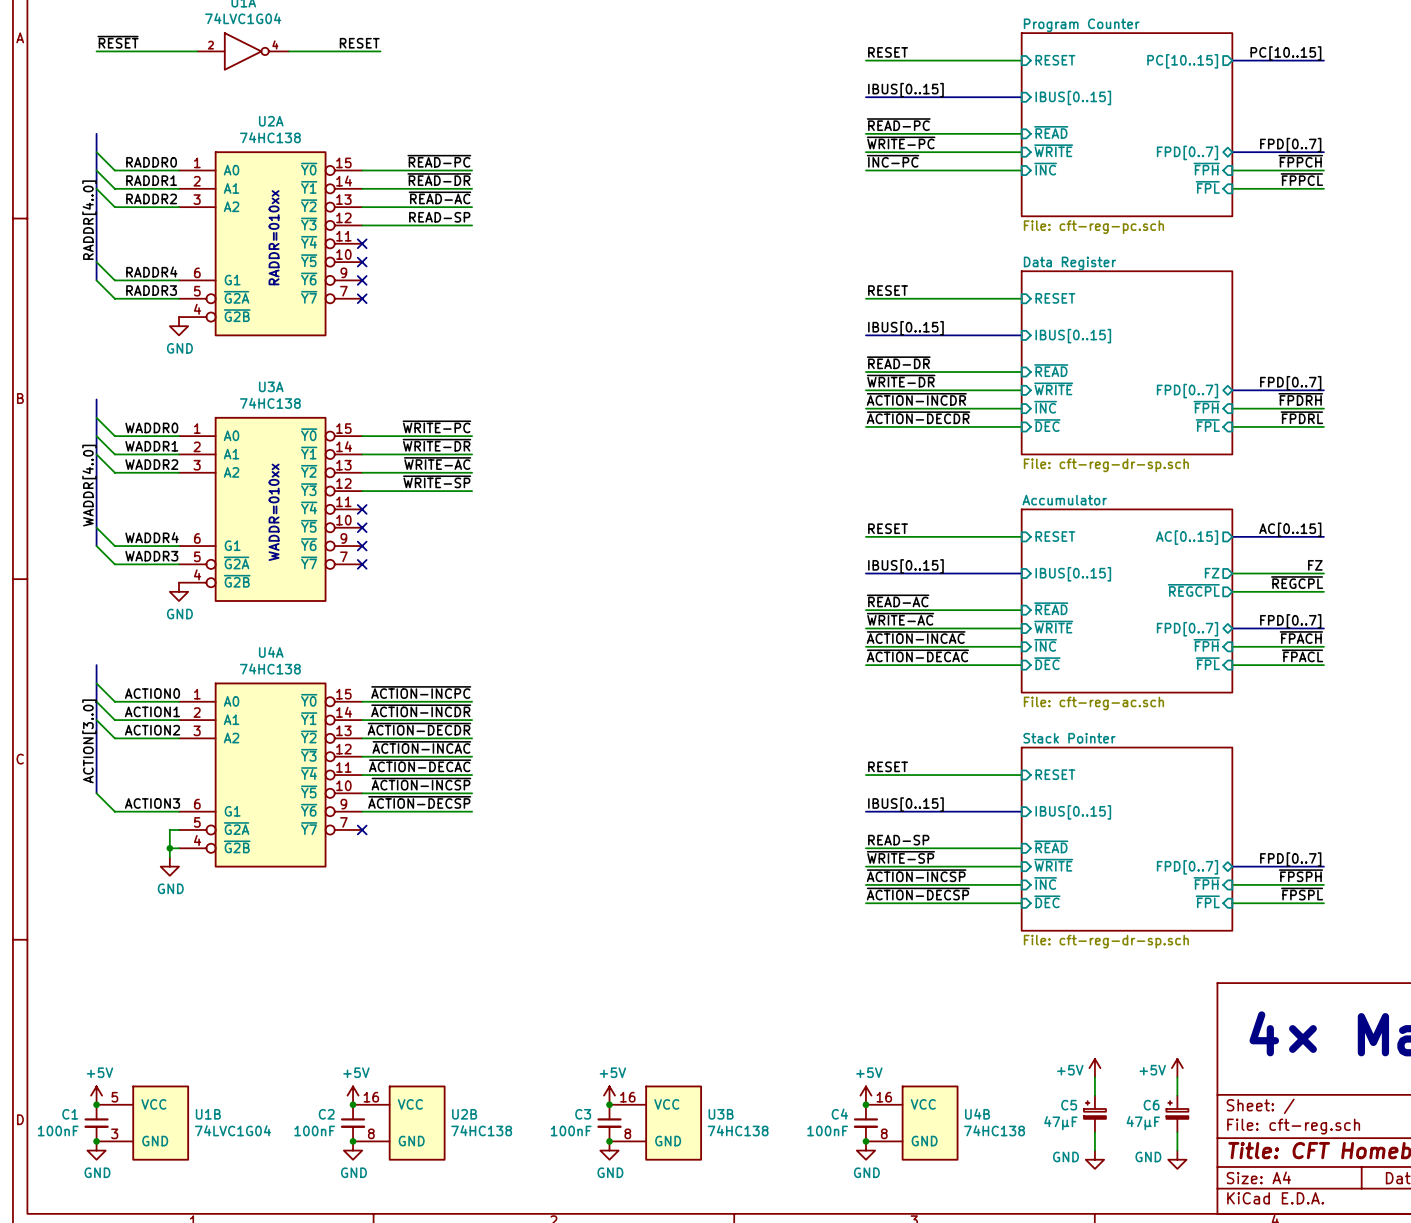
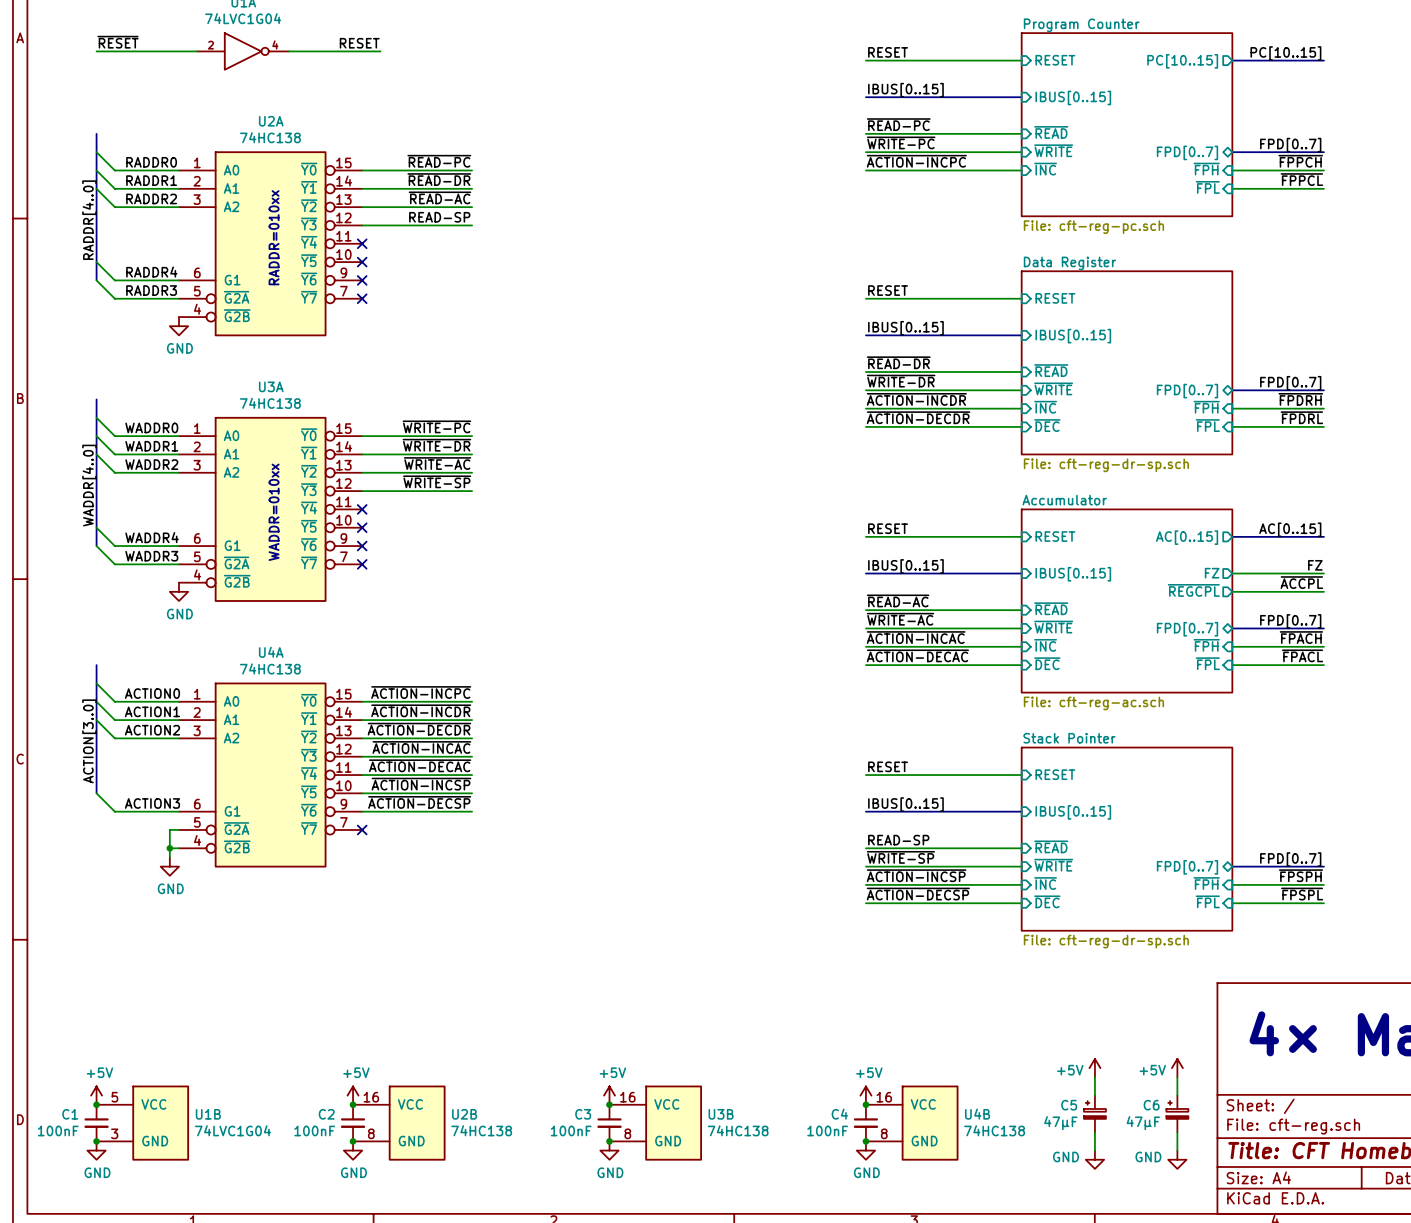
label: ~{INC-PC} (893, 161) -> ~{ACTION-INCPC} (916, 161)
label: ~{REGCPL} (1297, 582) -> ~{ACCPL} (1301, 582)

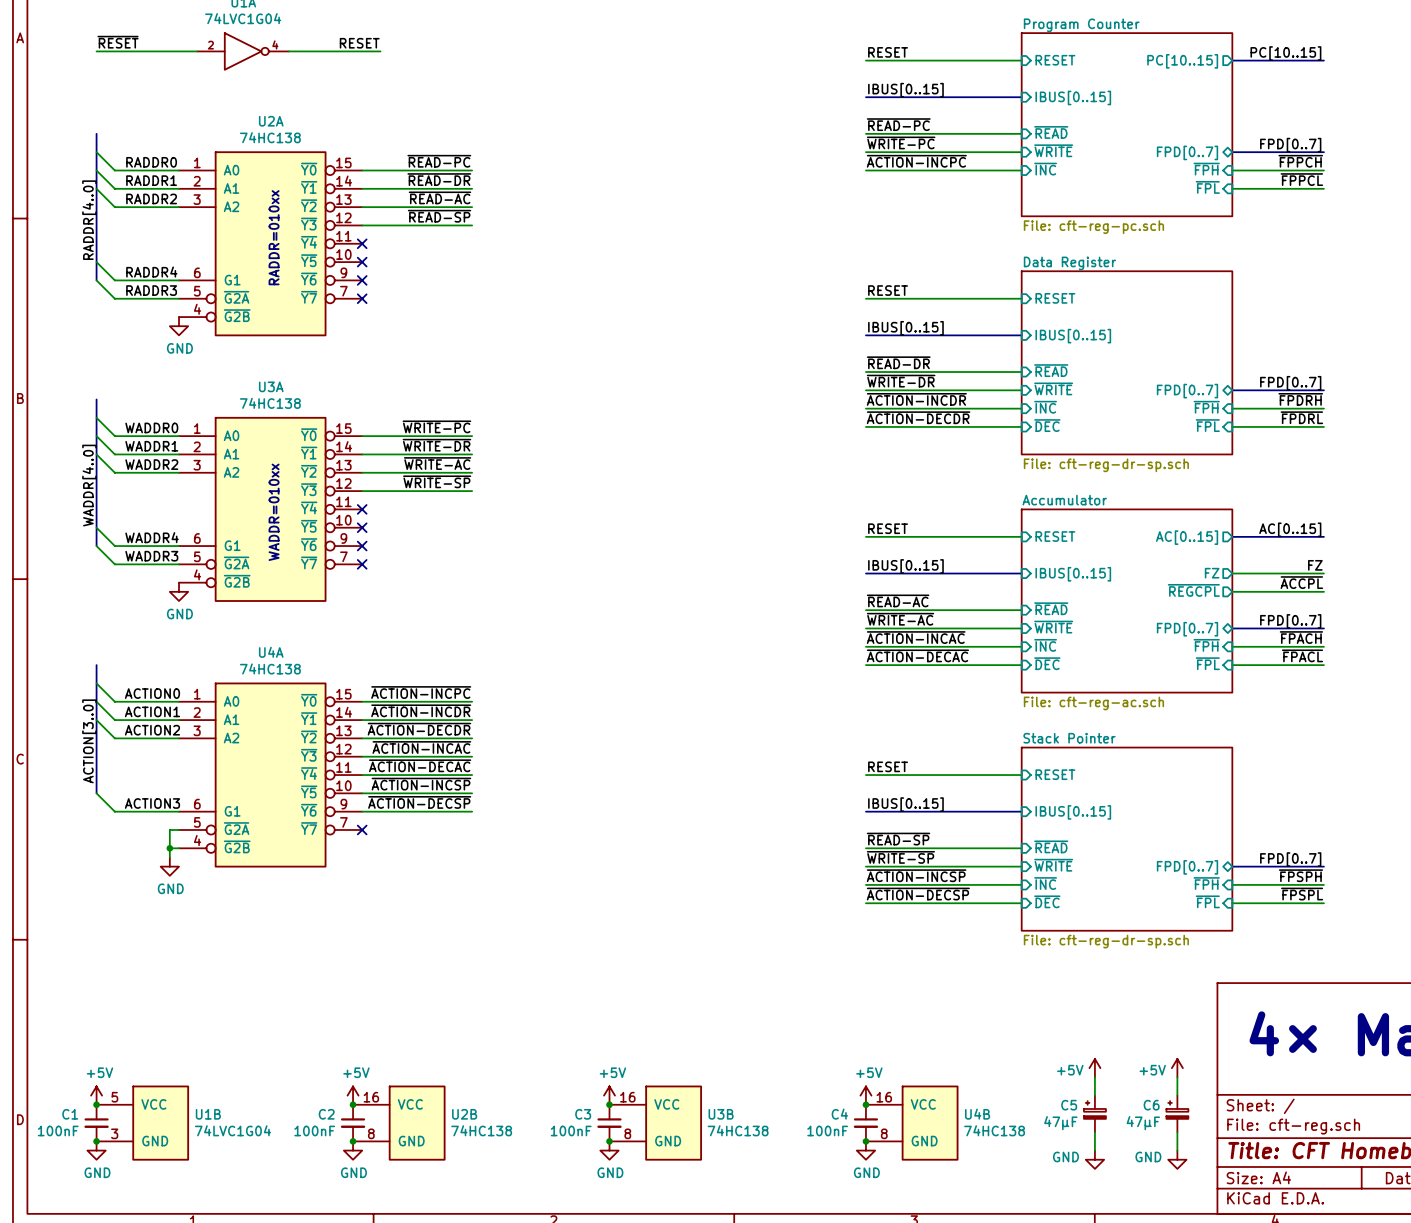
label: READ-SP (439, 217) -> ~{READ-SP} (439, 216)
label: READ-SP (898, 840) -> ~{READ-SP} (898, 839)

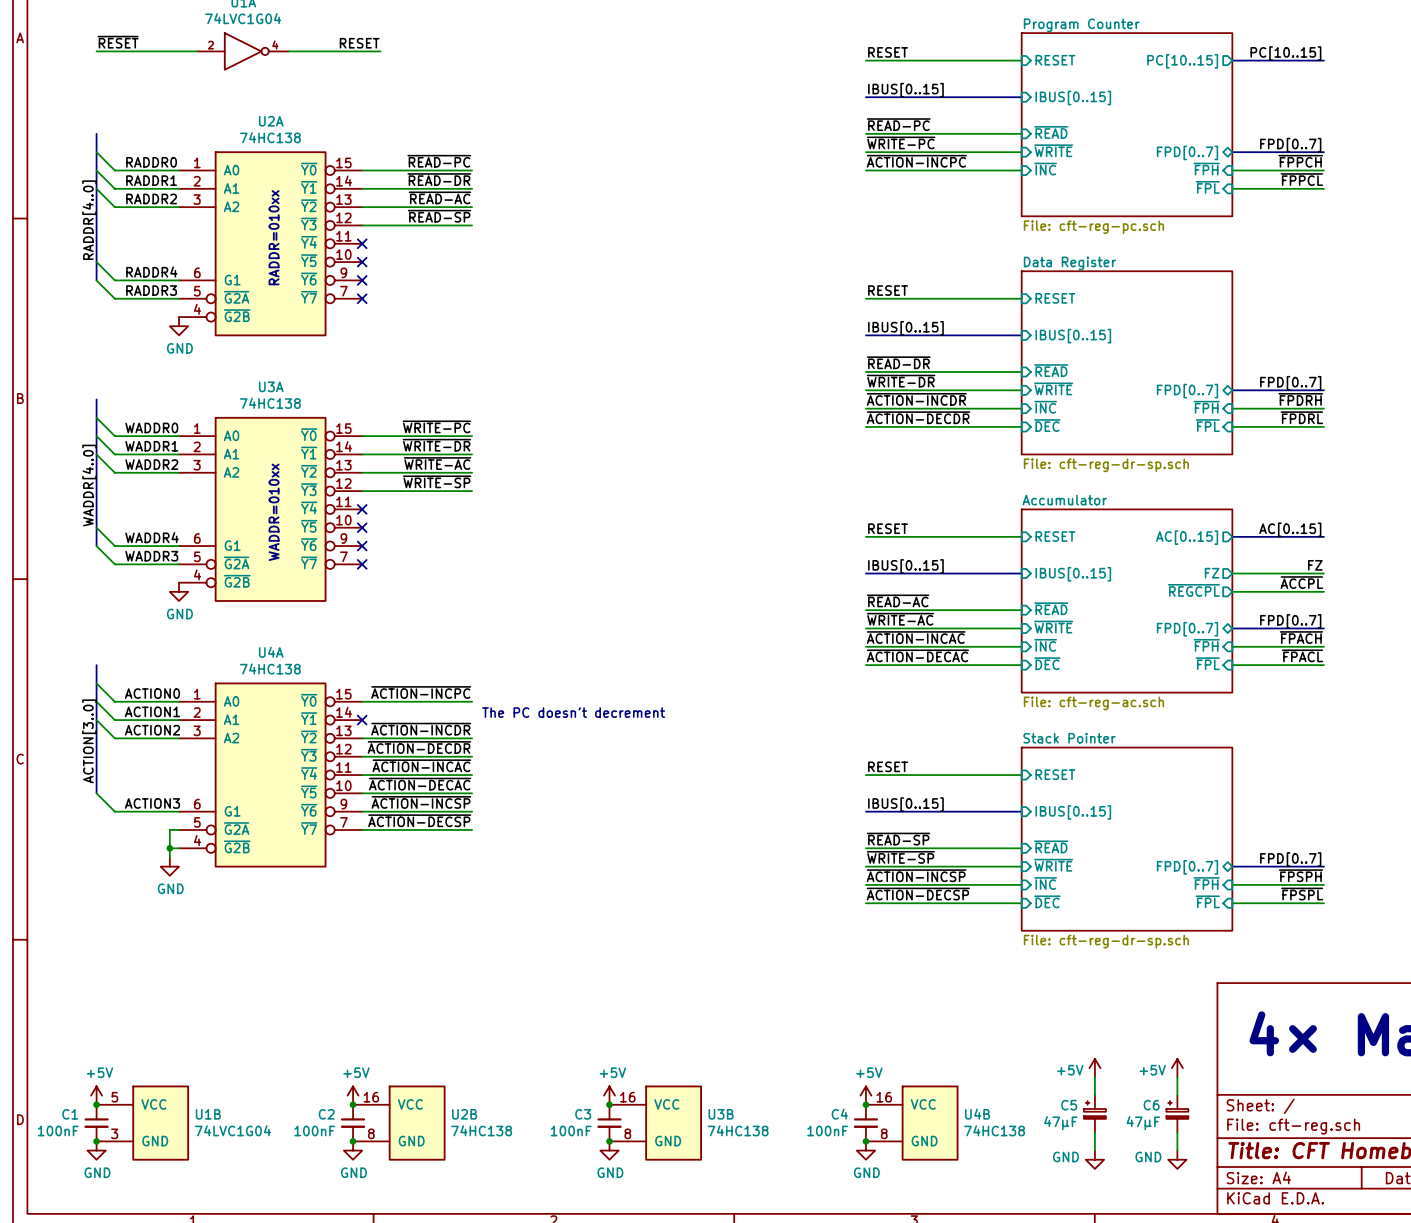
label: ~{ACTION-INCDR} (421, 710) -> none
text: none -> The PC doesn't decrement (573, 712)
wire: (362, 720) (472, 720) -> (362, 829) (472, 829)
no-connect mark: none -> (362, 720)
label: ~{ACTION-DECDR} (419, 729) -> ~{ACTION-INCDR} (421, 729)
label: ~{ACTION-INCAC} (421, 747) -> ~{ACTION-DECDR} (419, 747)
label: ~{ACTION-DECAC} (420, 765) -> ~{ACTION-INCAC} (421, 765)
label: ~{ACTION-INCSP} (421, 784) -> ~{ACTION-DECAC} (420, 784)
label: ~{ACTION-DECSP} (419, 802) -> ~{ACTION-INCSP} (421, 802)
label: none -> ~{ACTION-DECSP} (419, 820)
no-connect mark: (362, 829) -> none

